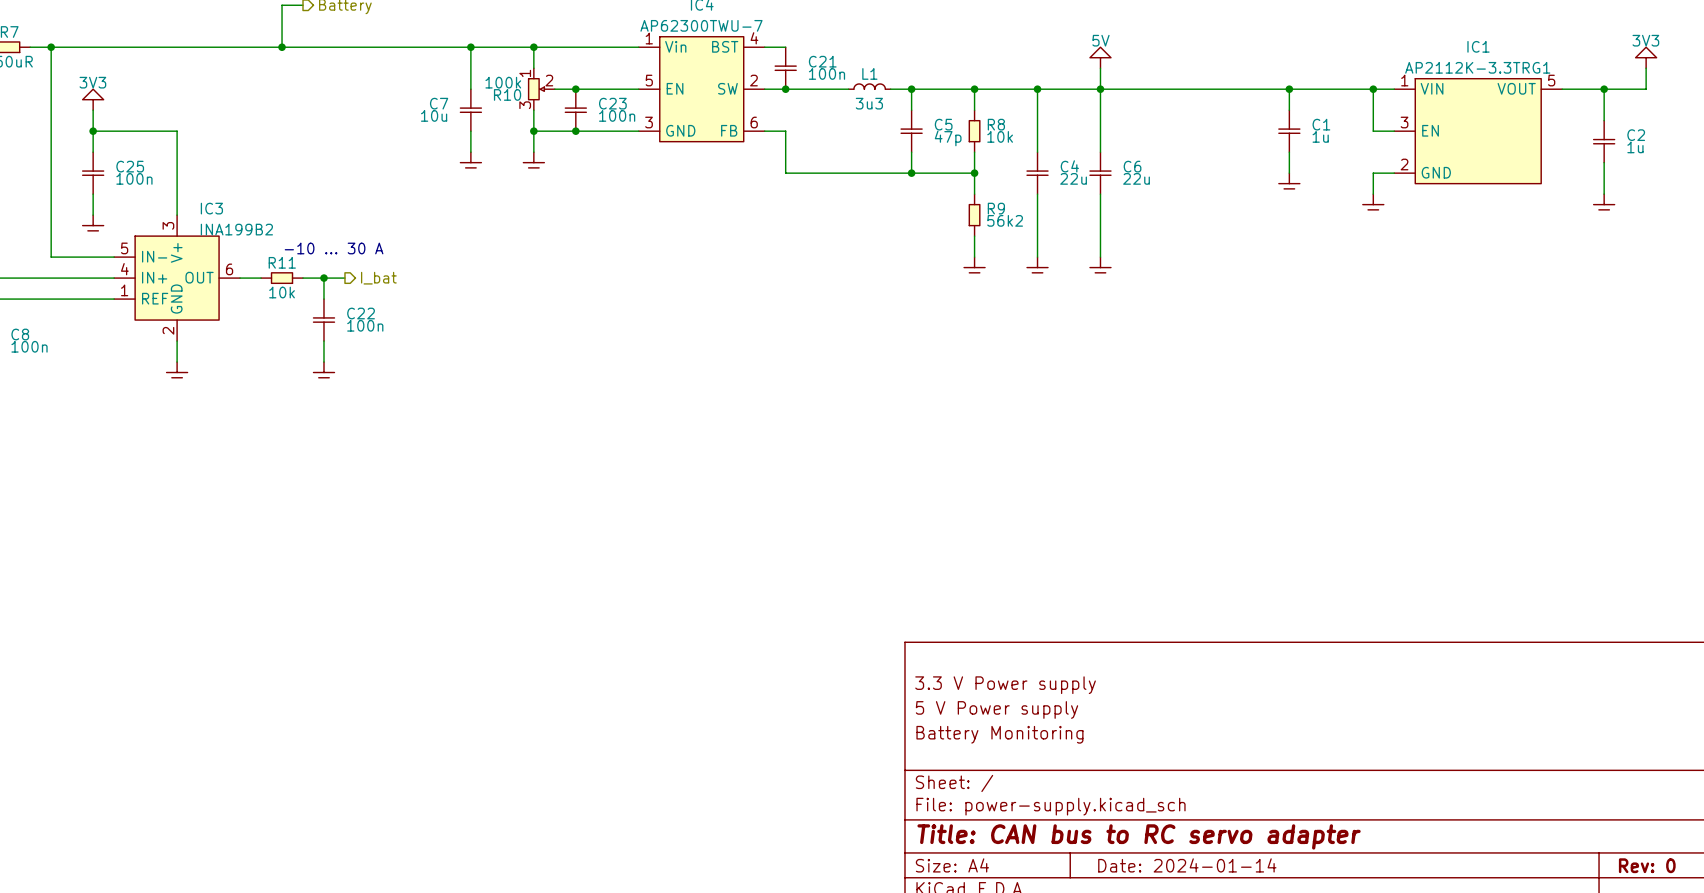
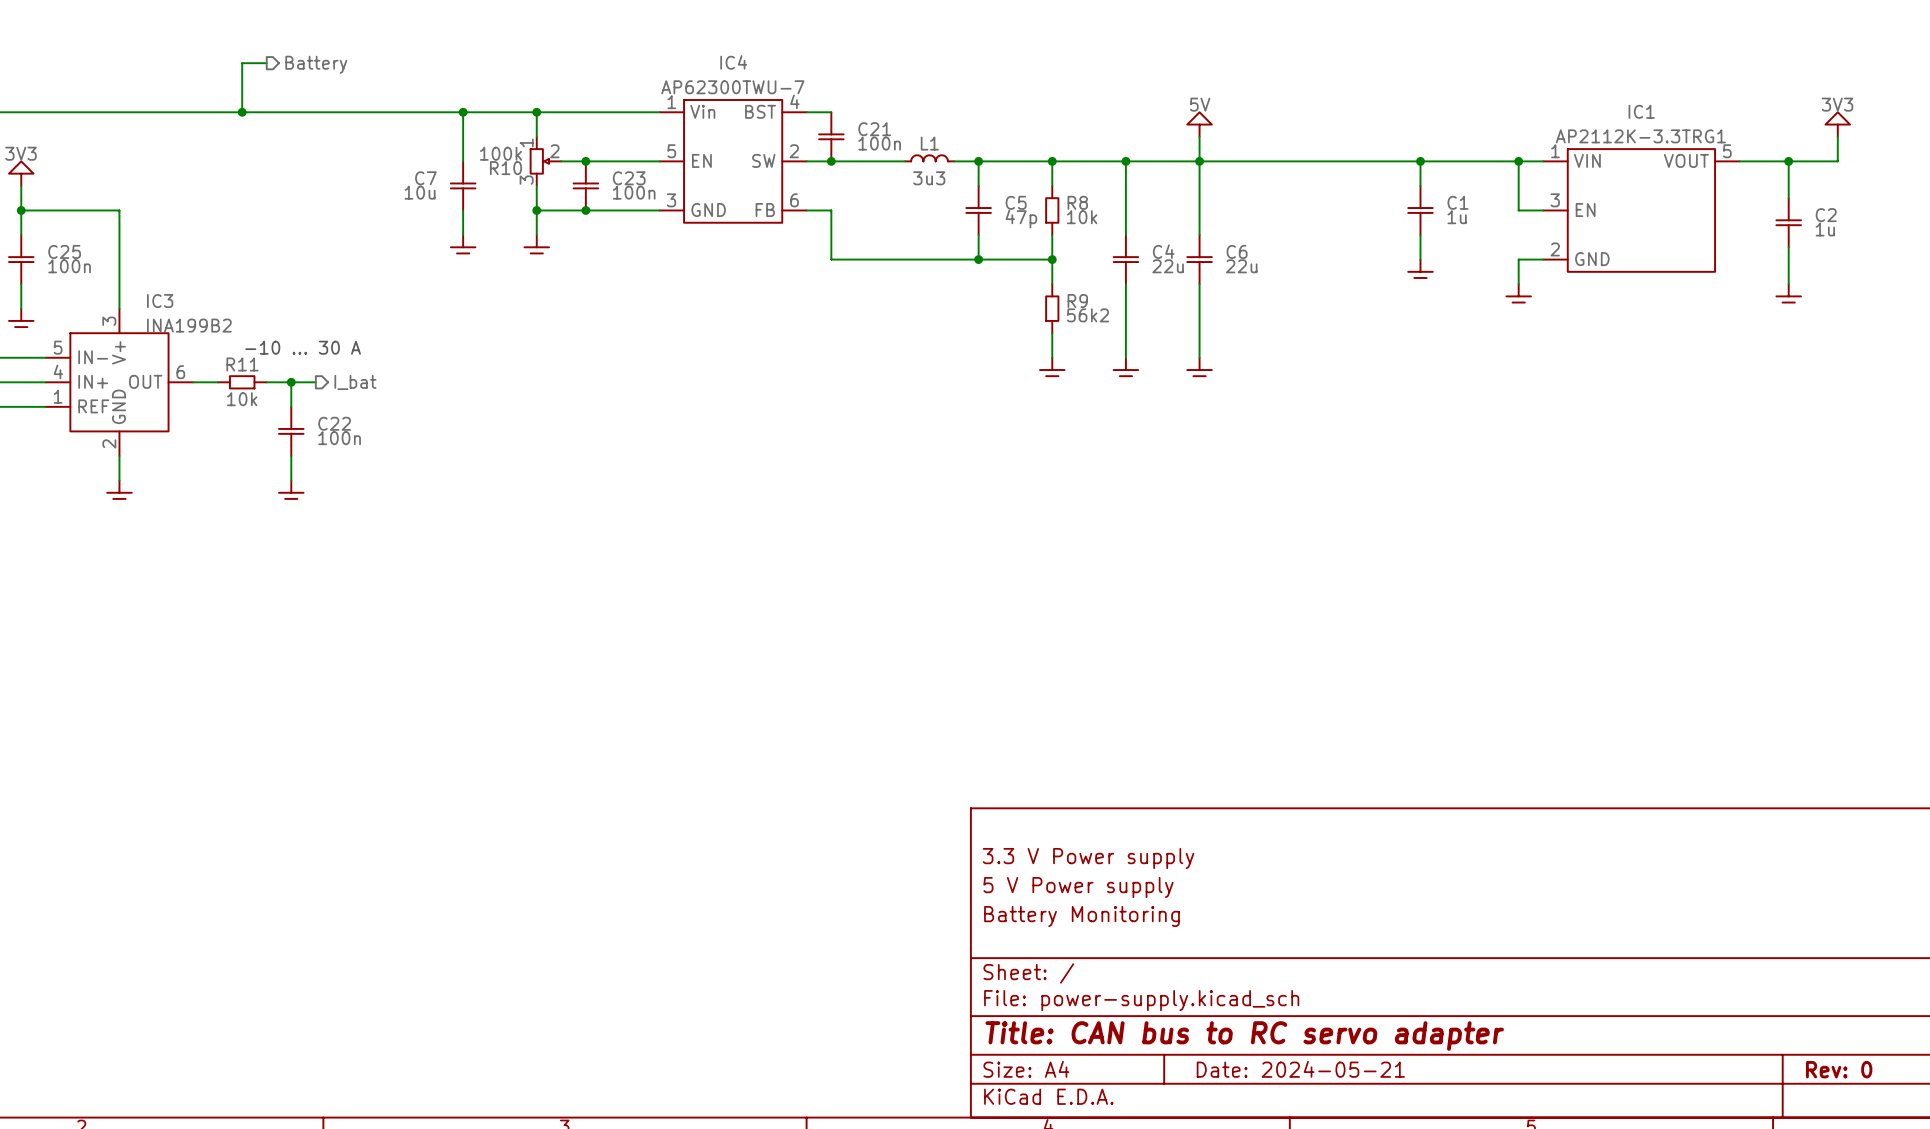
title block: Date: 2024-01-14 (1187, 865) -> Date: 2024-05-21 (1300, 1069)

